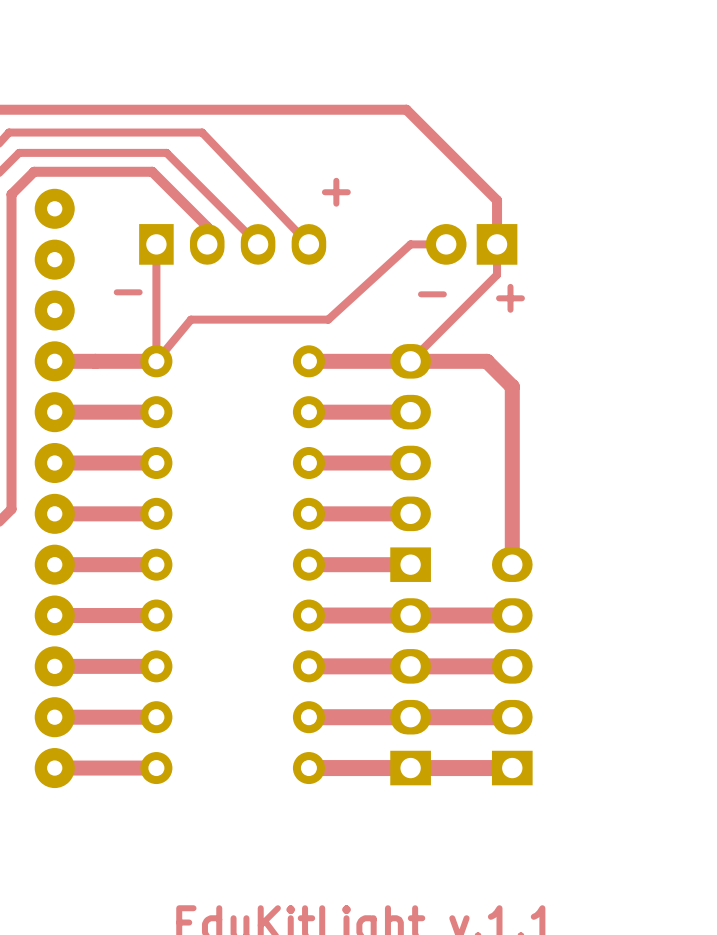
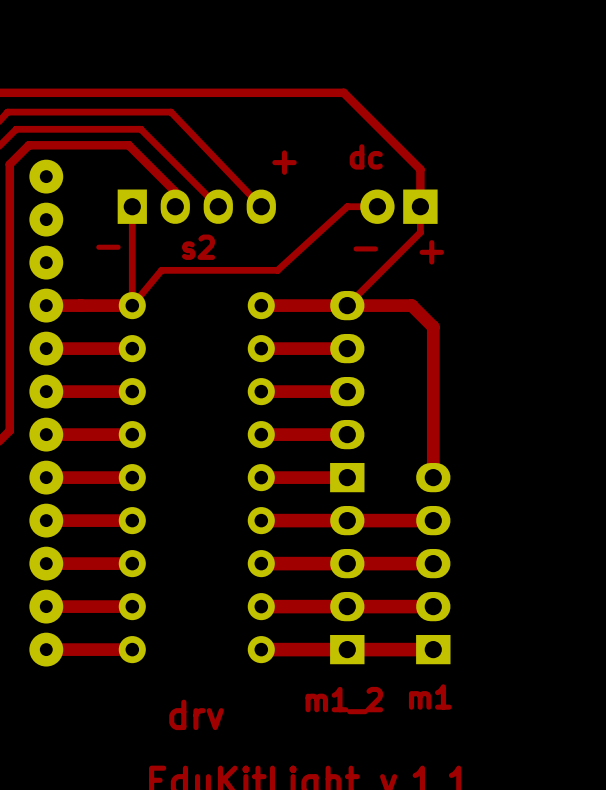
text: none -> dc (366, 156)
text: none -> s2 (198, 247)
text: none -> m1 (430, 697)
text: none -> m1_2 (344, 700)
text: none -> drv (196, 714)

